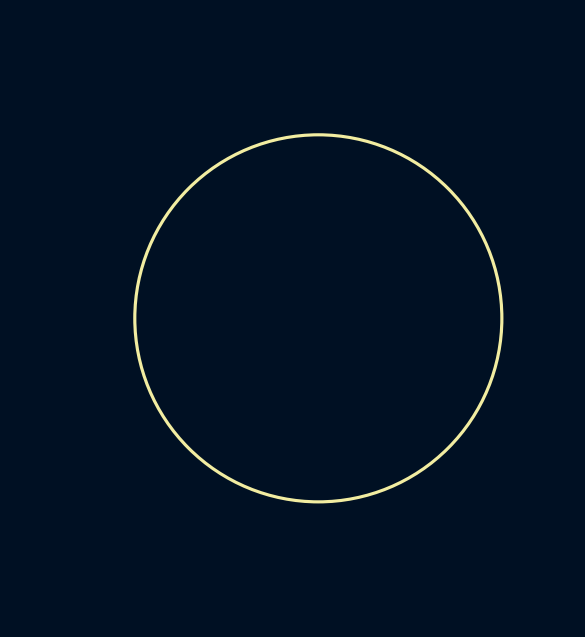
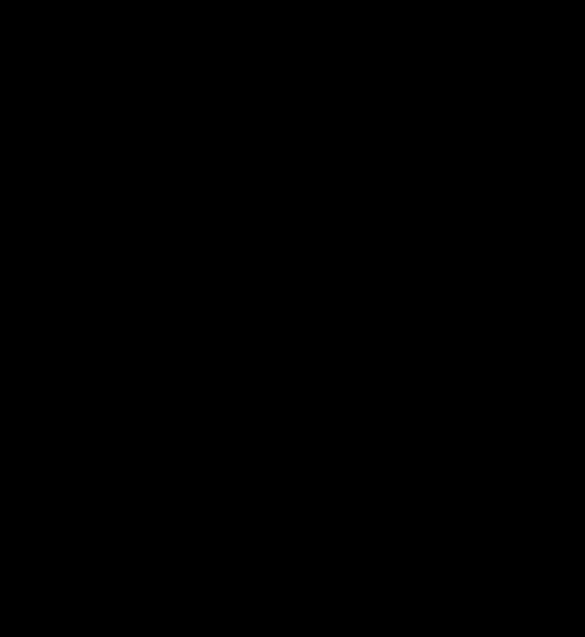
drawing: [133, 133, 504, 504] -> none

